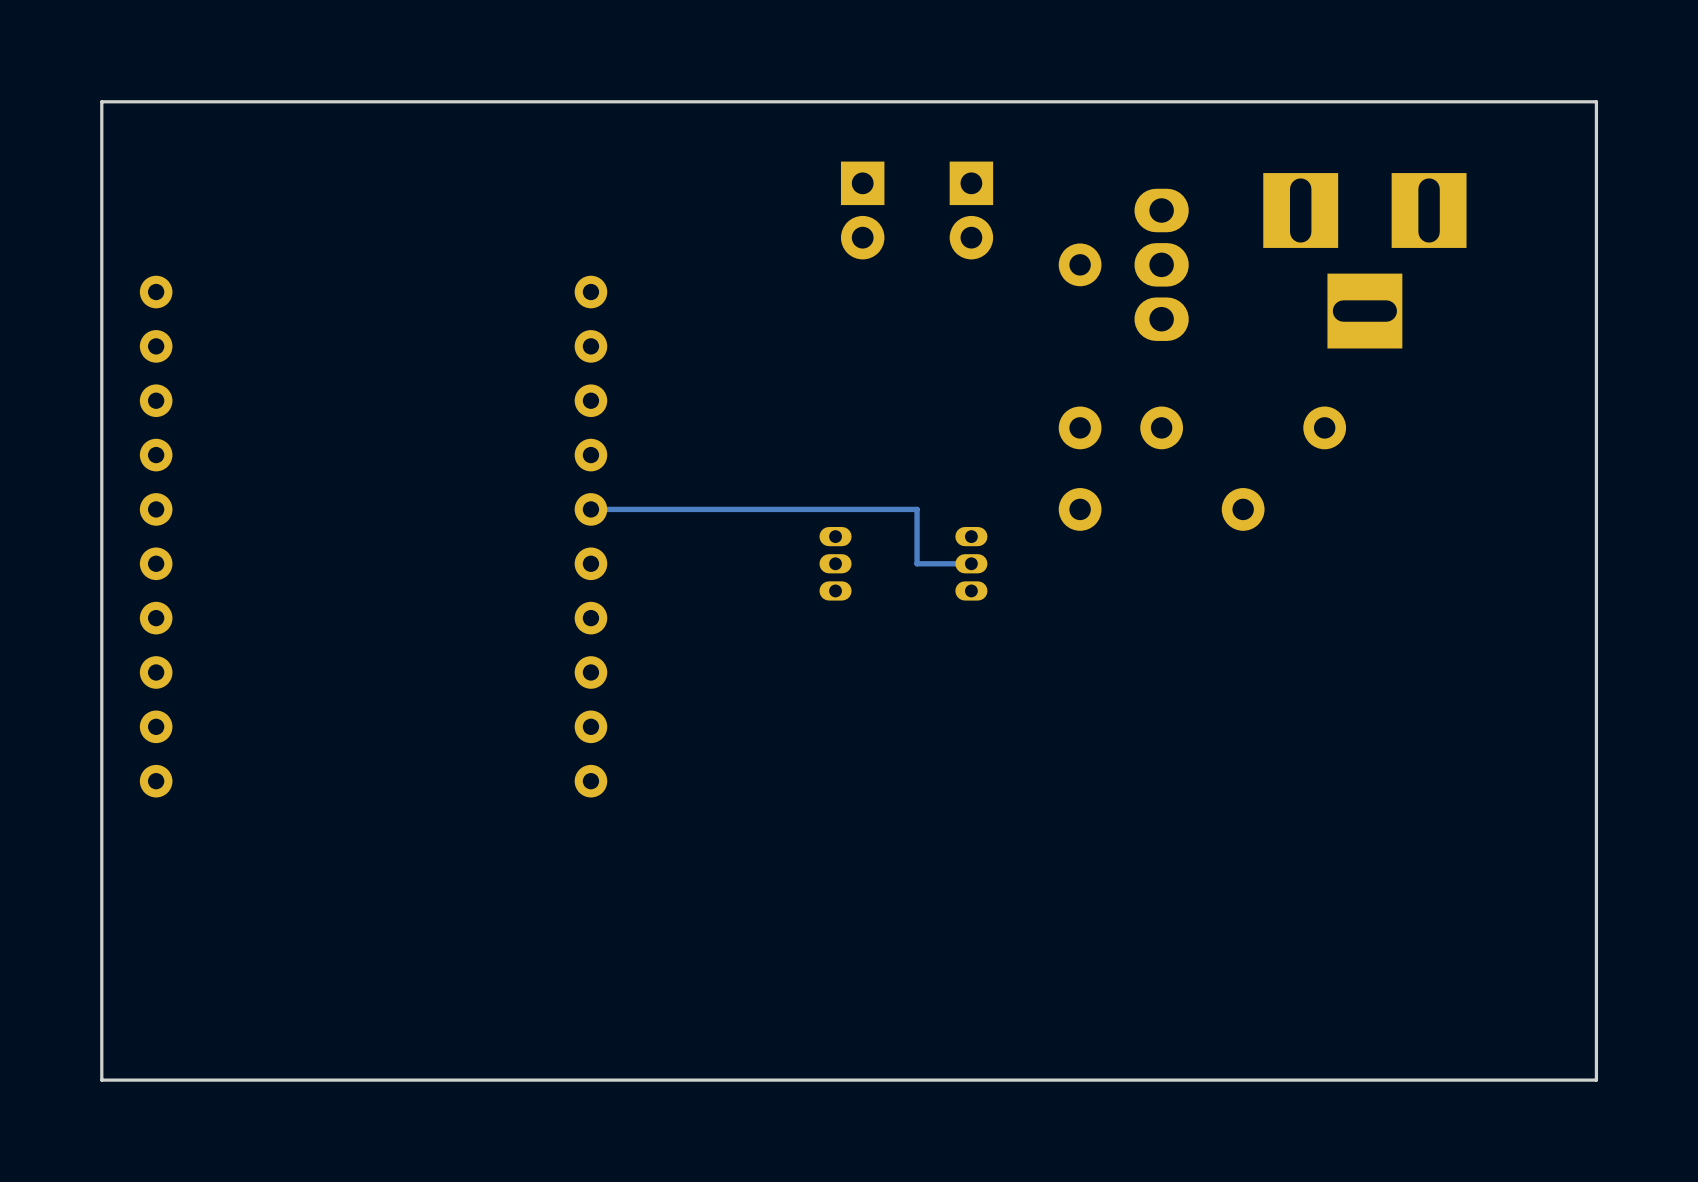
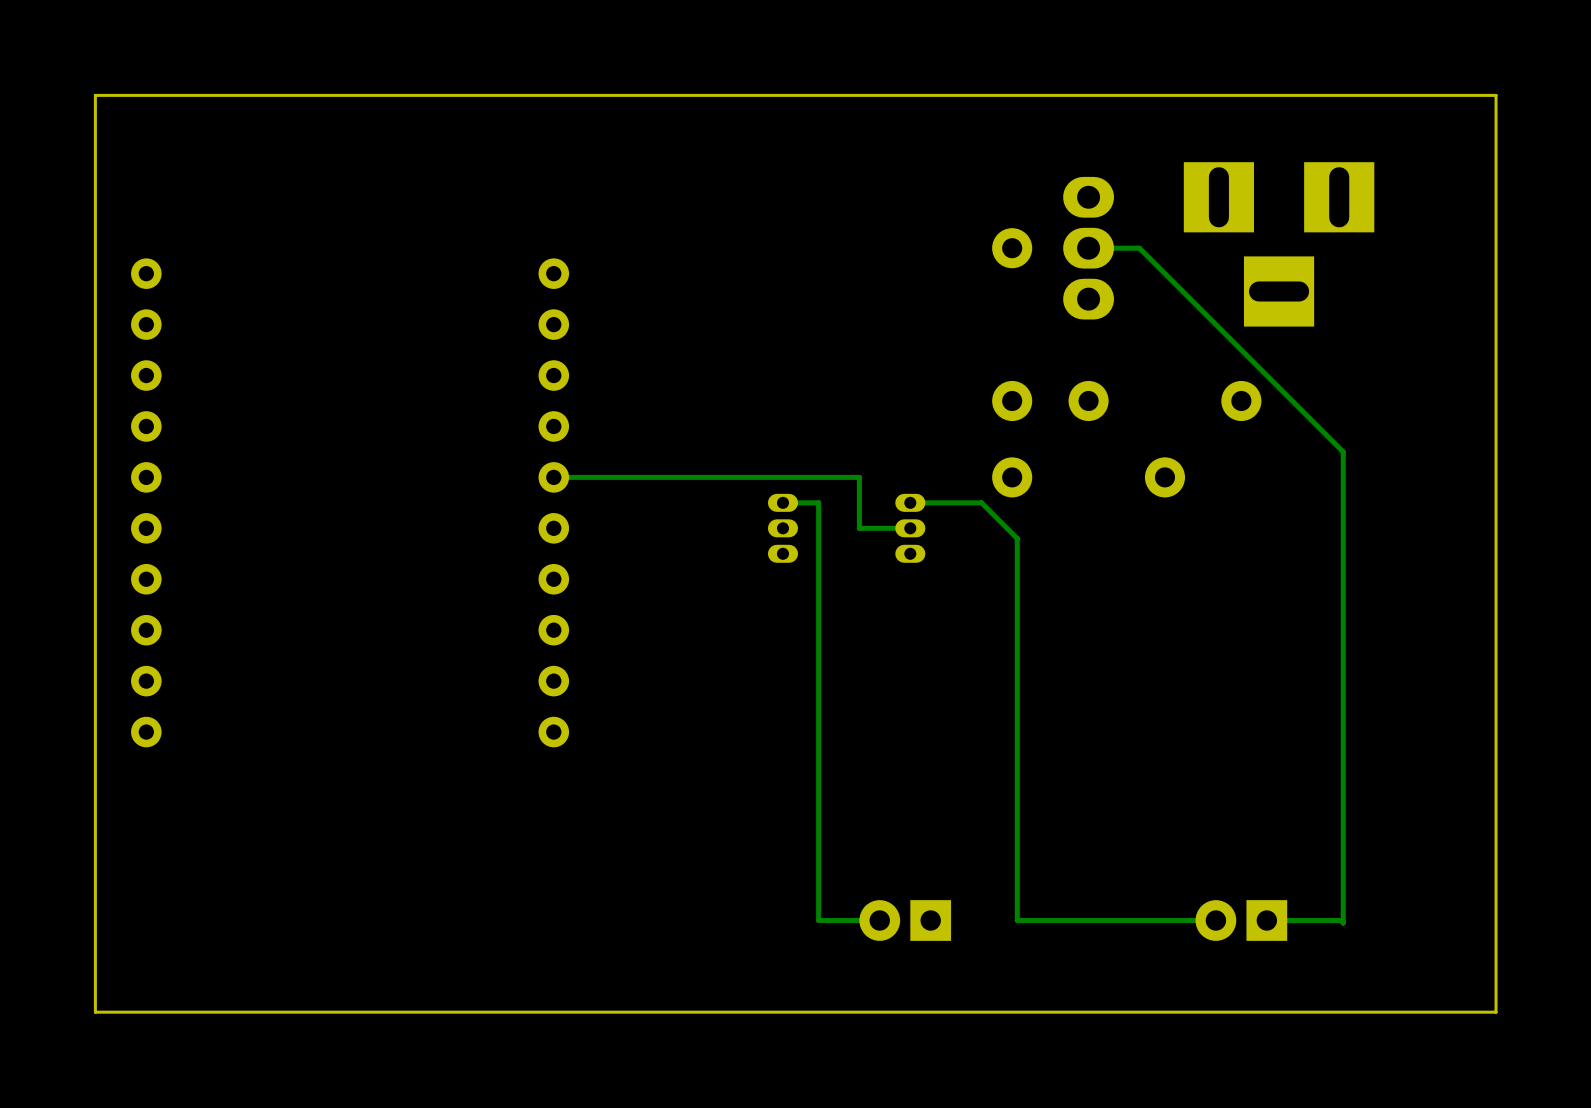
part: (862, 210) -> none
part: (971, 210) -> none
track: none -> (1088, 248) (1139, 248) (1343, 451) (1343, 923) (1340, 920) (1266, 920)
track: none -> (782, 502) (818, 502) (818, 920) (879, 920)
track: none -> (910, 502) (981, 502) (1017, 538) (1017, 920) (1215, 920)
part: none -> (905, 920)
part: none -> (1241, 920)

